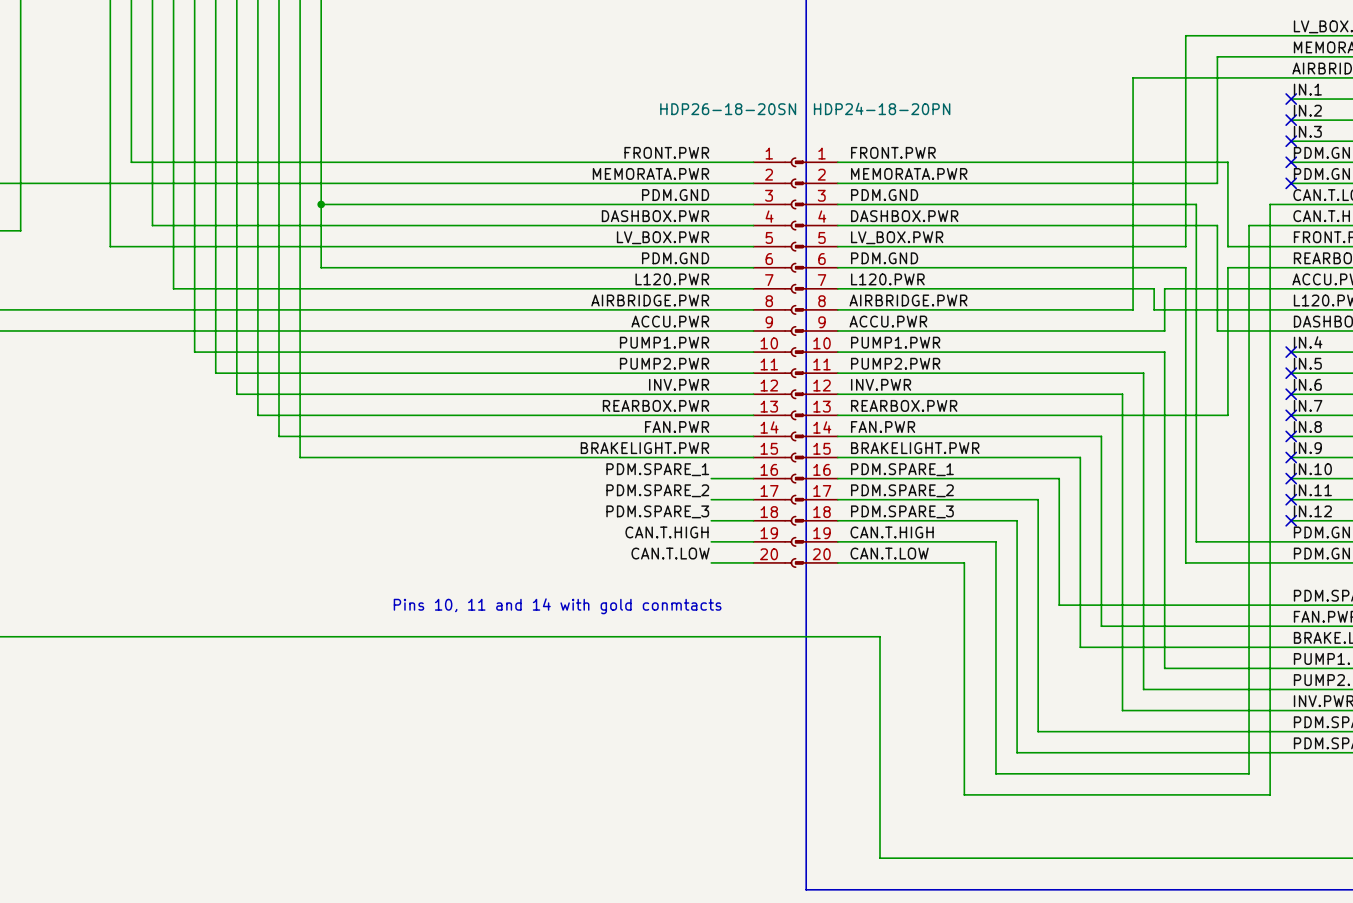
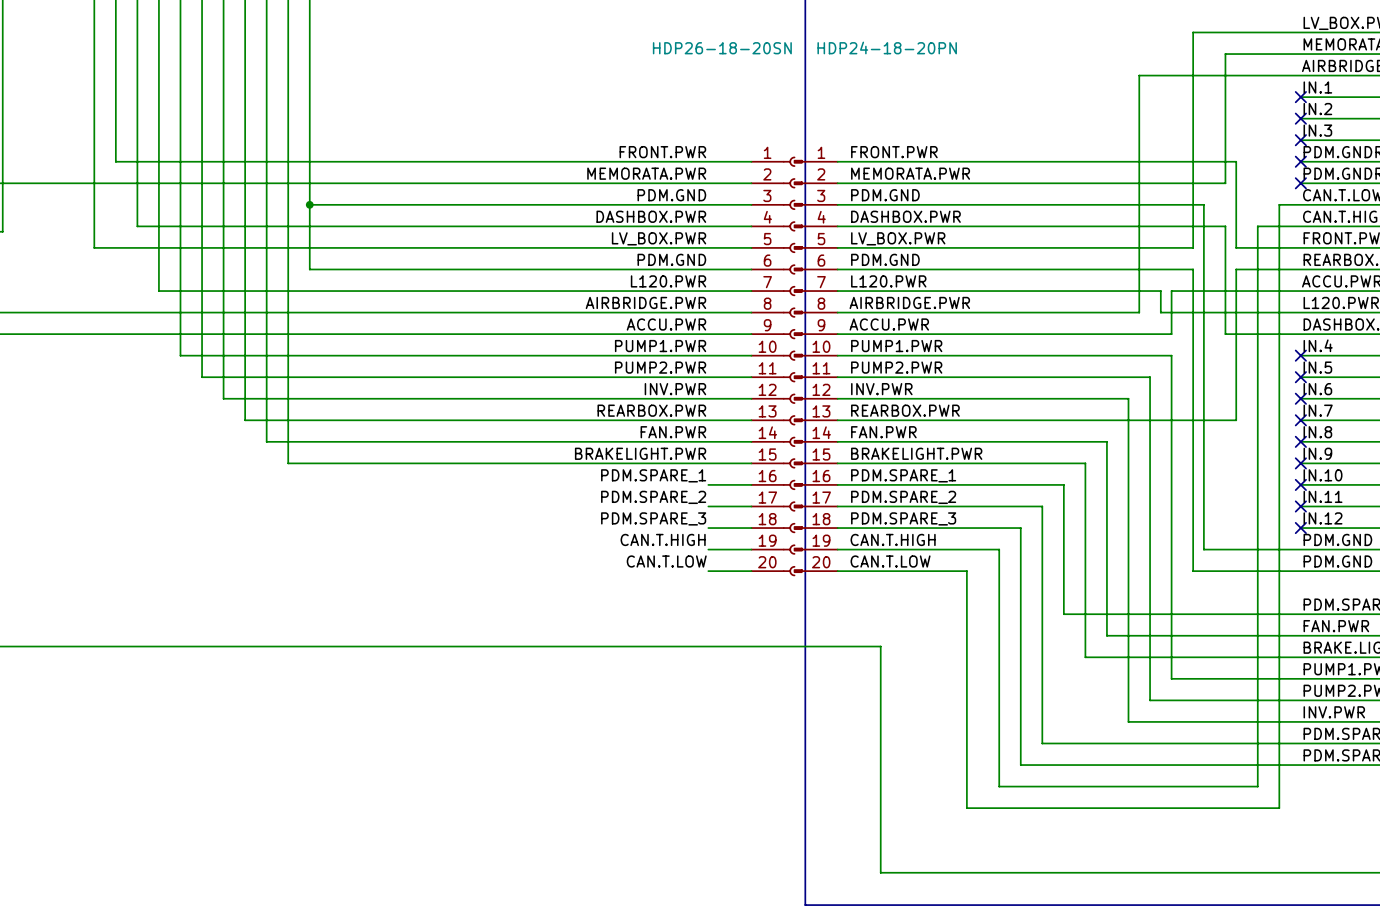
part text position: HDP24-18-20PN (882, 108) -> HDP24-18-20PN (887, 47)
part text position: HDP26-18-20SN (728, 109) -> HDP26-18-20SN (722, 48)
text: Pins 10, 11 and 14 with gold conmtacts (557, 606) -> none

